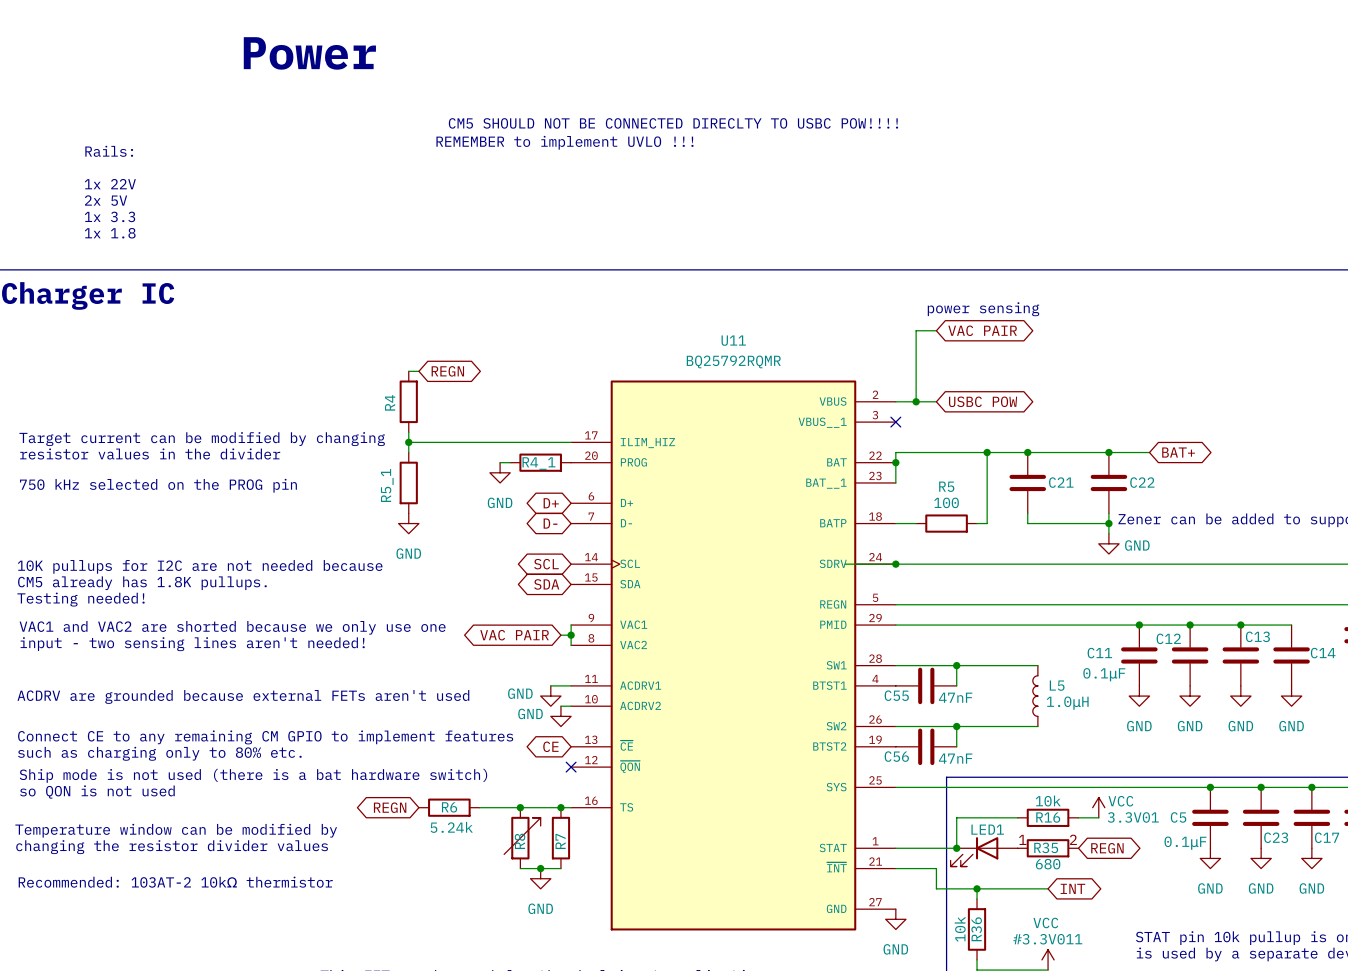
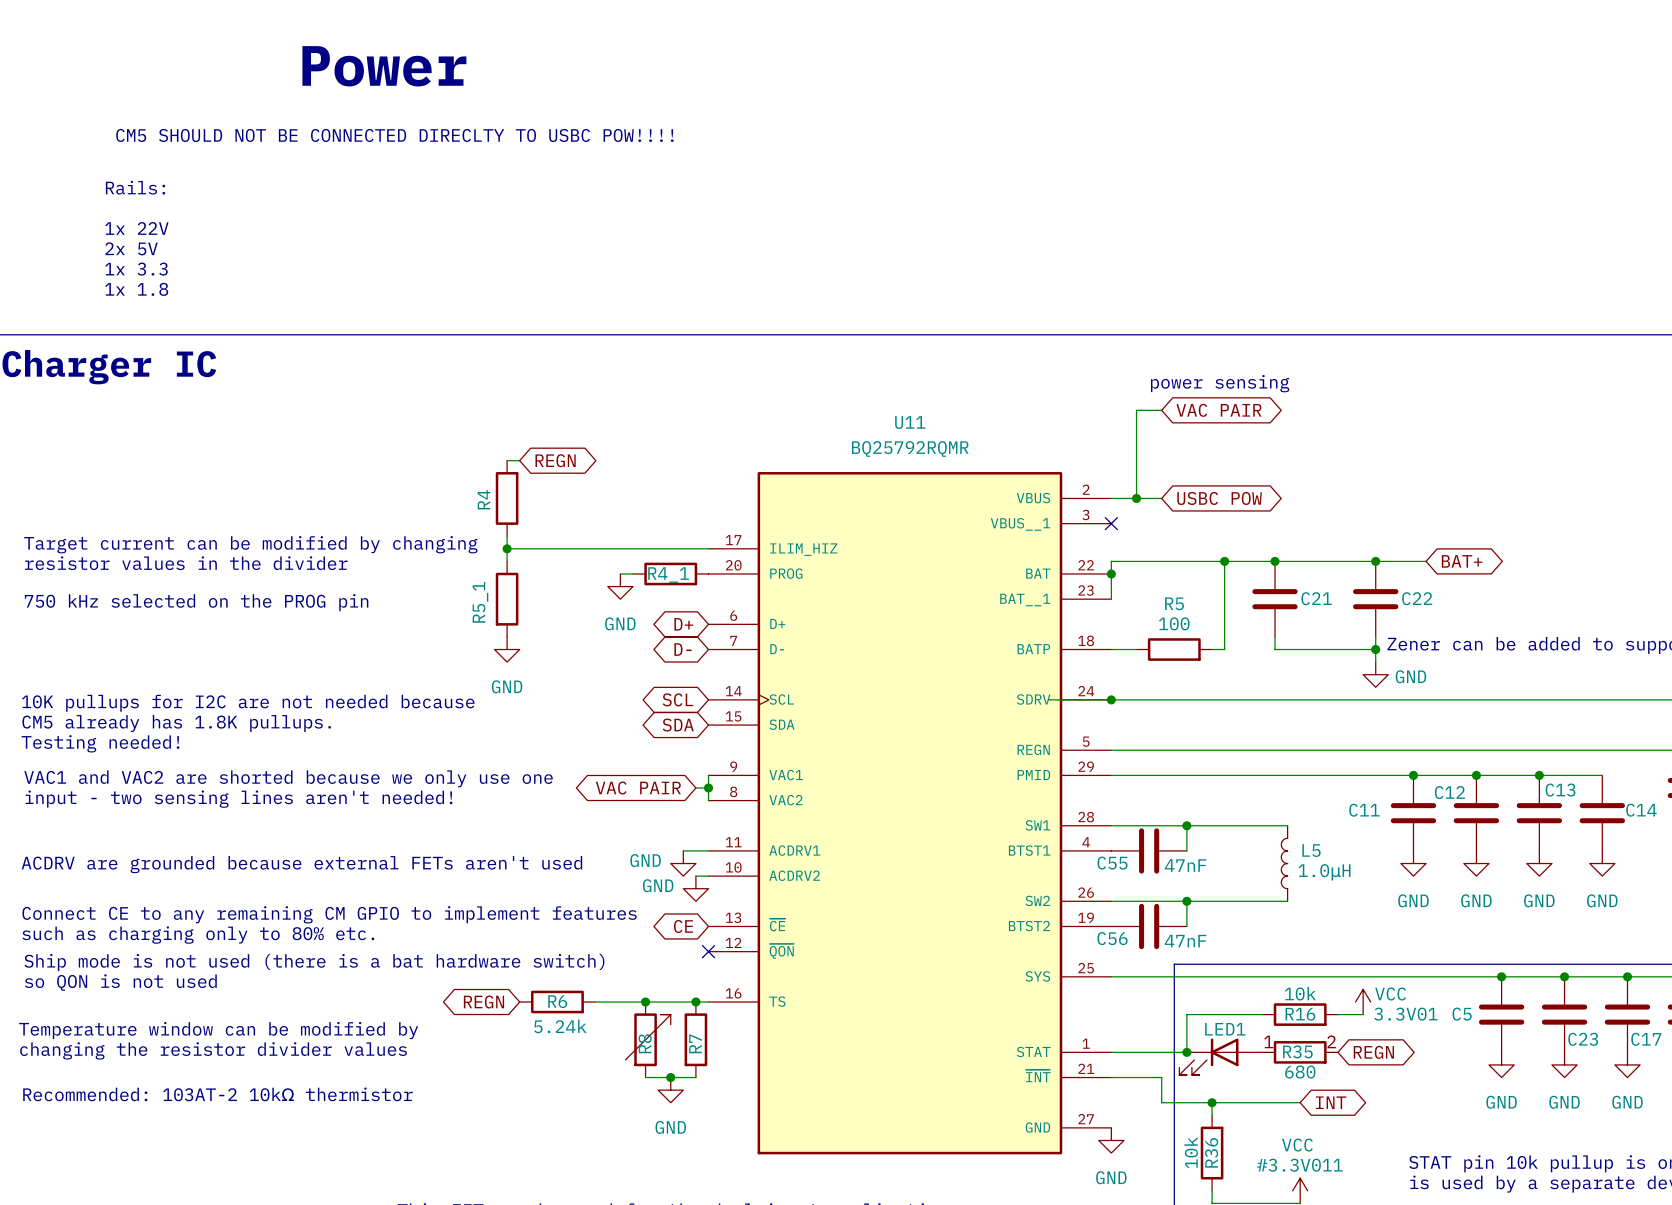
text: none -> CM5 SHOULD NOT BE CONNECTED DIRECLTY TO USBC POW!!!! (394, 135)
text: CM5 SHOULD NOT BE CONNECTED DIRECLTY TO USBC POW!!!! (673, 123) -> none
text: REMEMBER to implement UVLO !!! (564, 142) -> none
C11 value: 0.1μF (1104, 674) -> none
C5 value: 0.1μF (1185, 843) -> none

